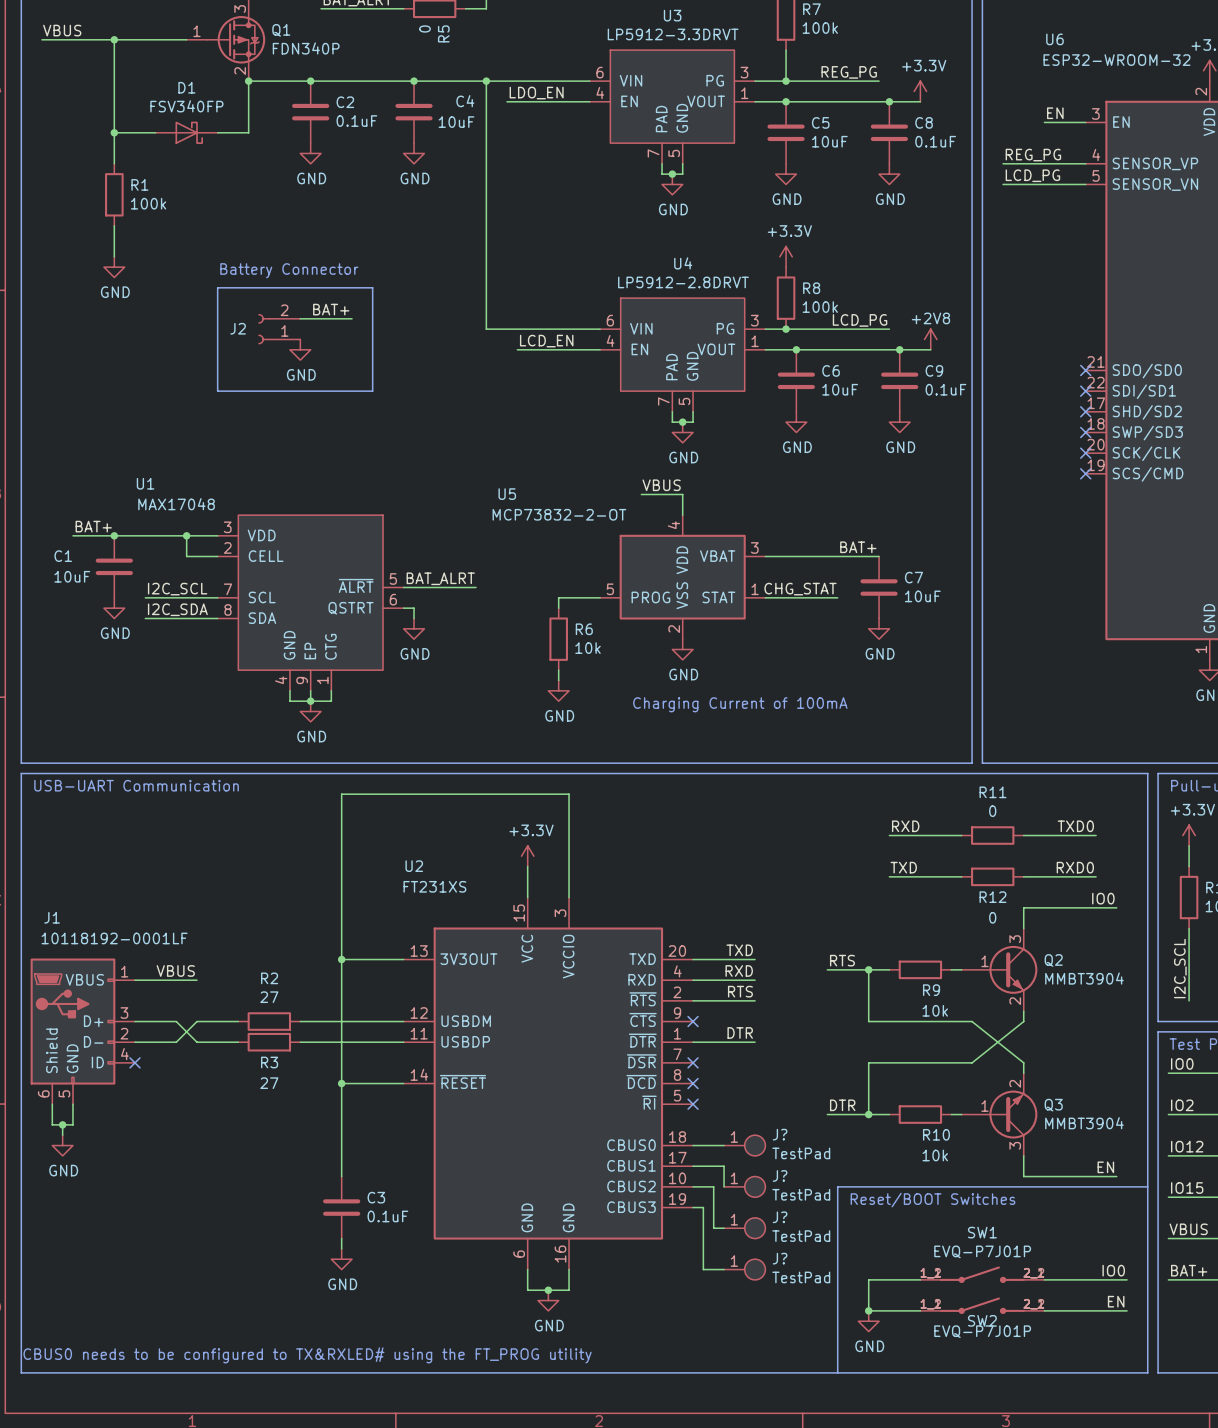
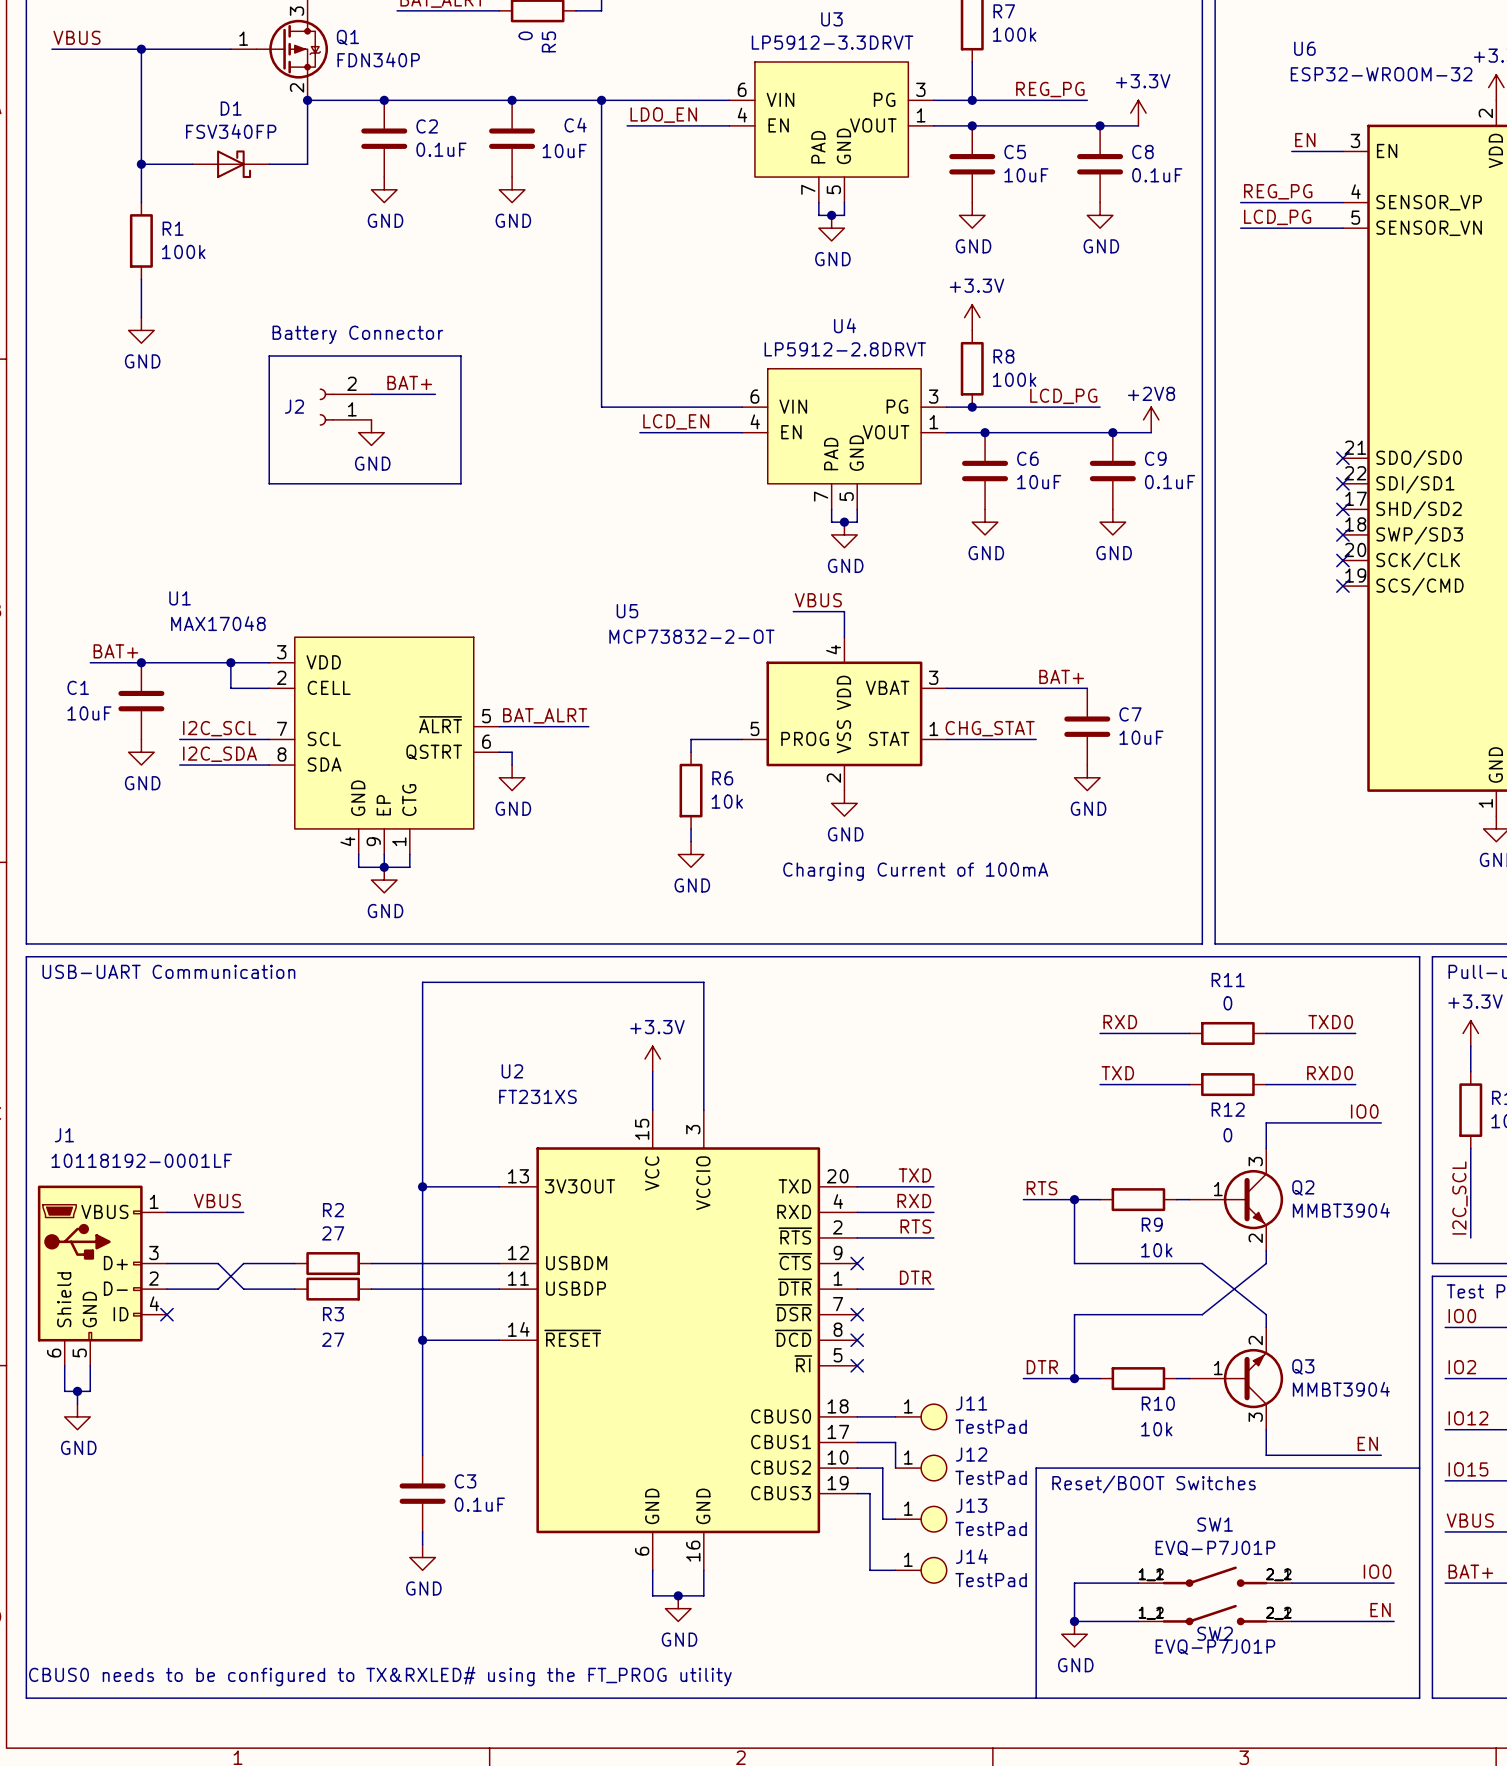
J? name: J? (780, 1134) -> J11 (971, 1403)
J? name: J? (780, 1175) -> J12 (971, 1454)
J? name: J? (780, 1217) -> J13 (971, 1505)
J? name: J? (780, 1258) -> J14 (971, 1556)

